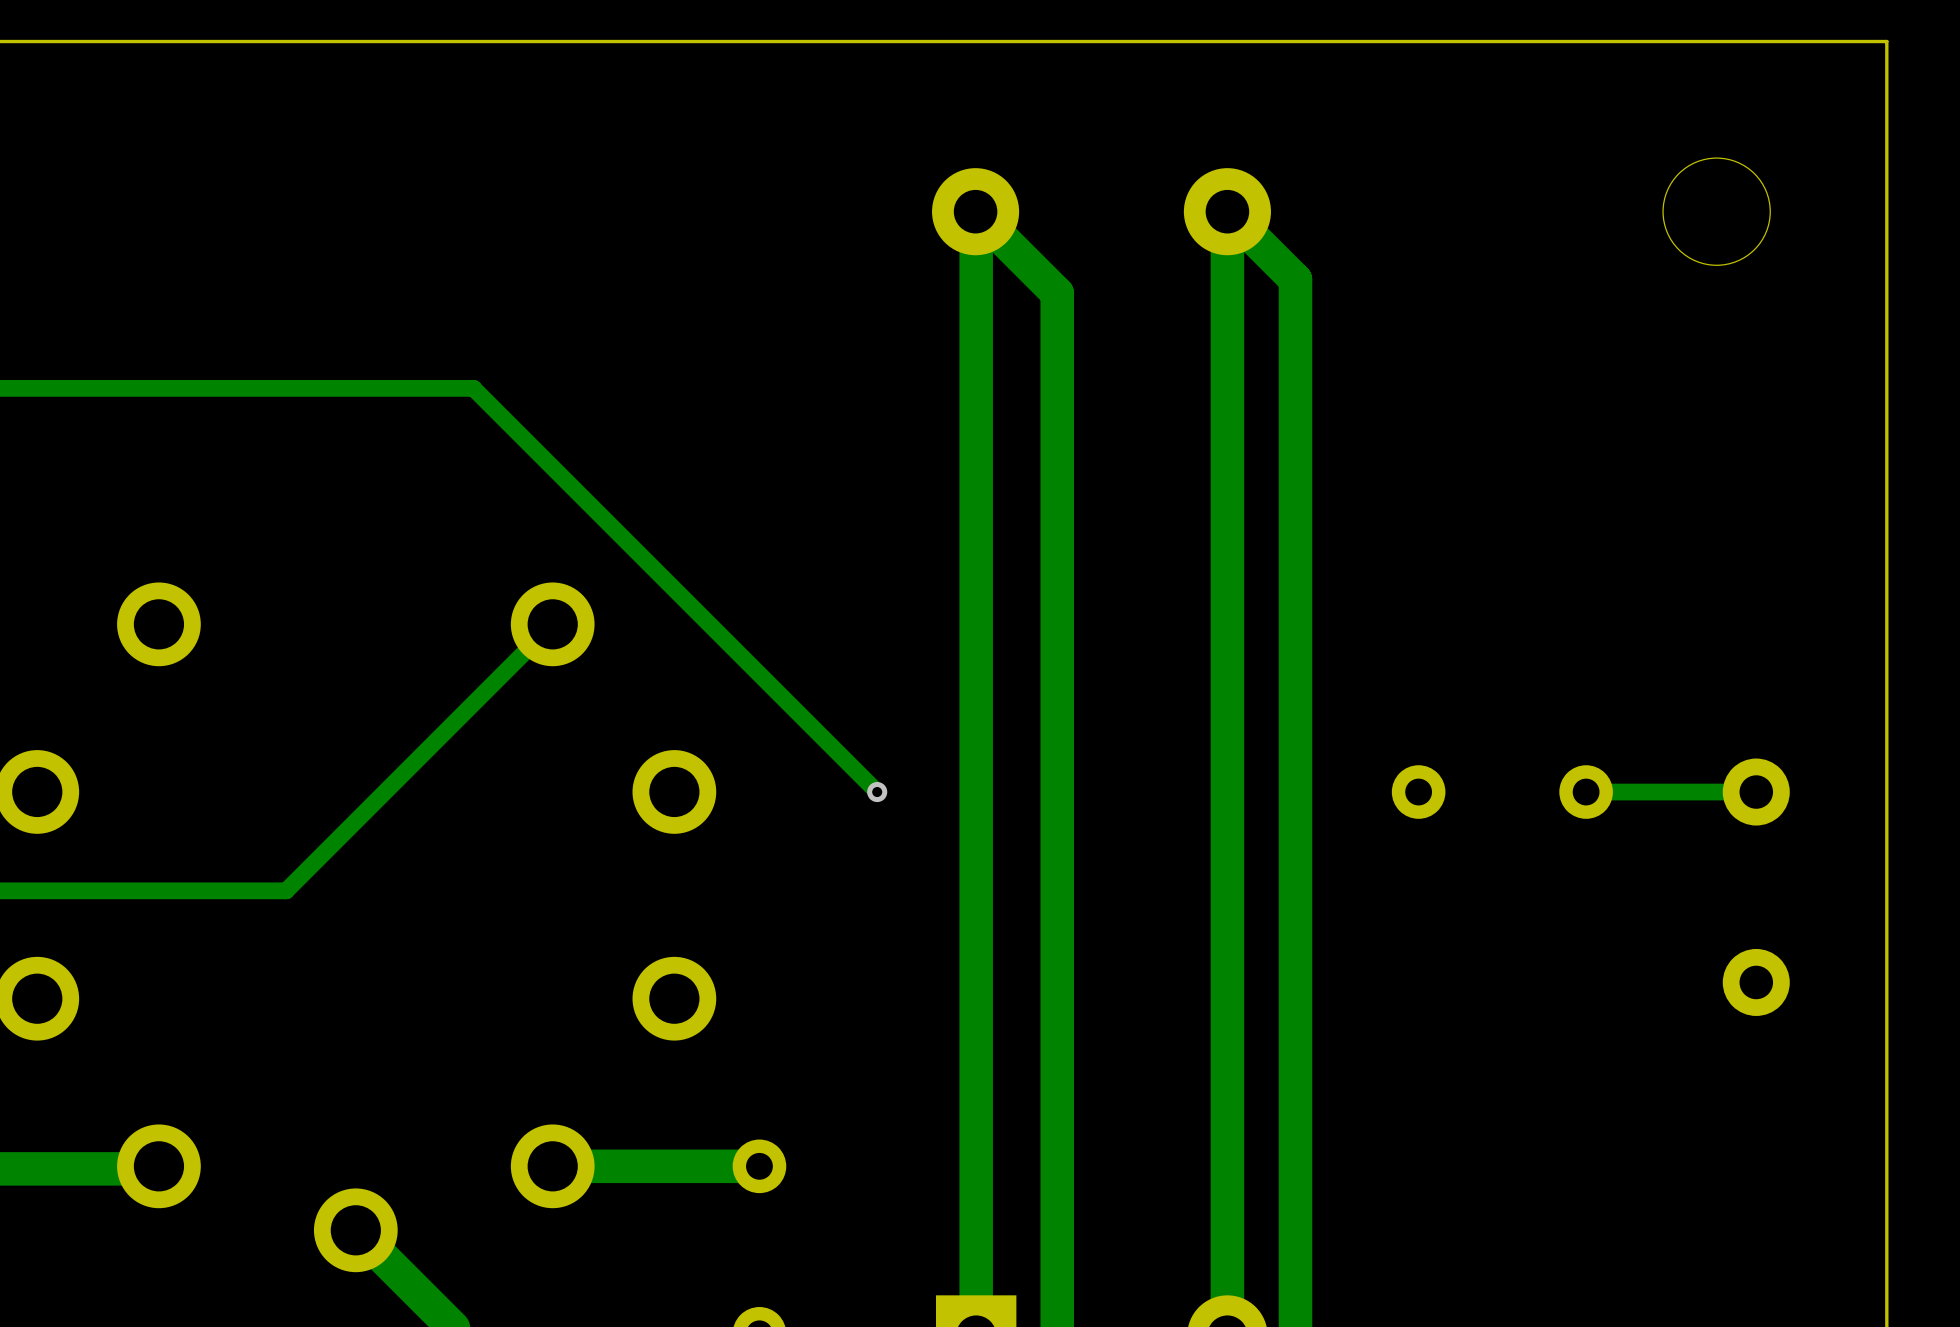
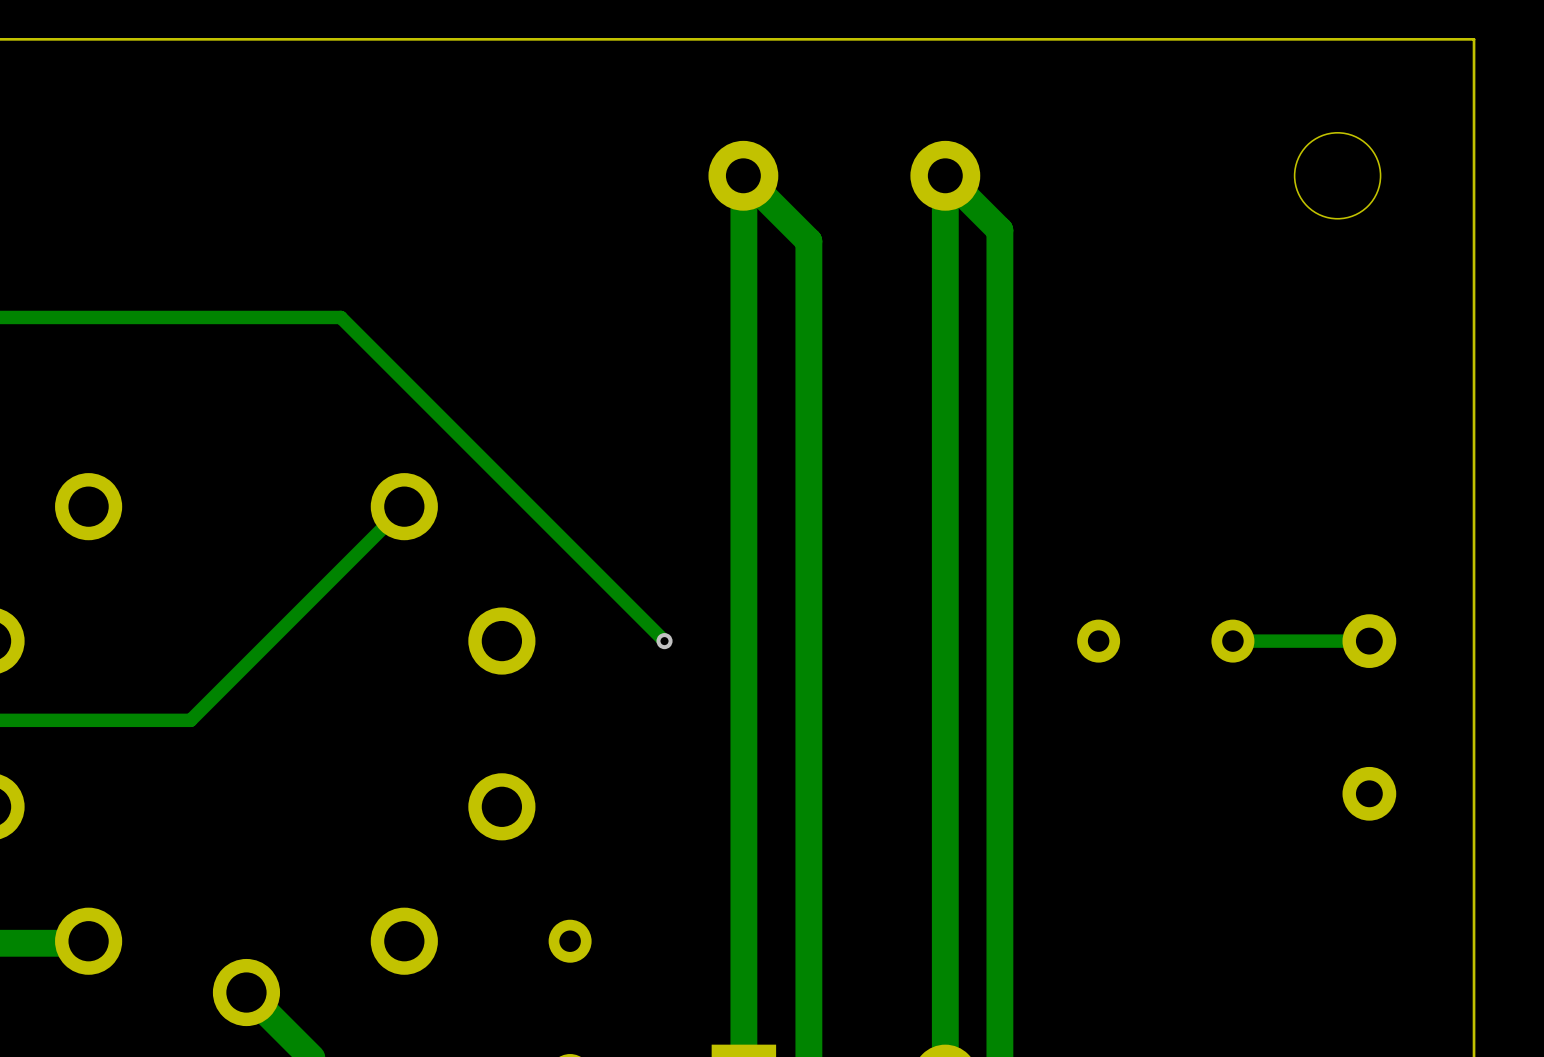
track: (759, 1166) (552, 1166) -> none

